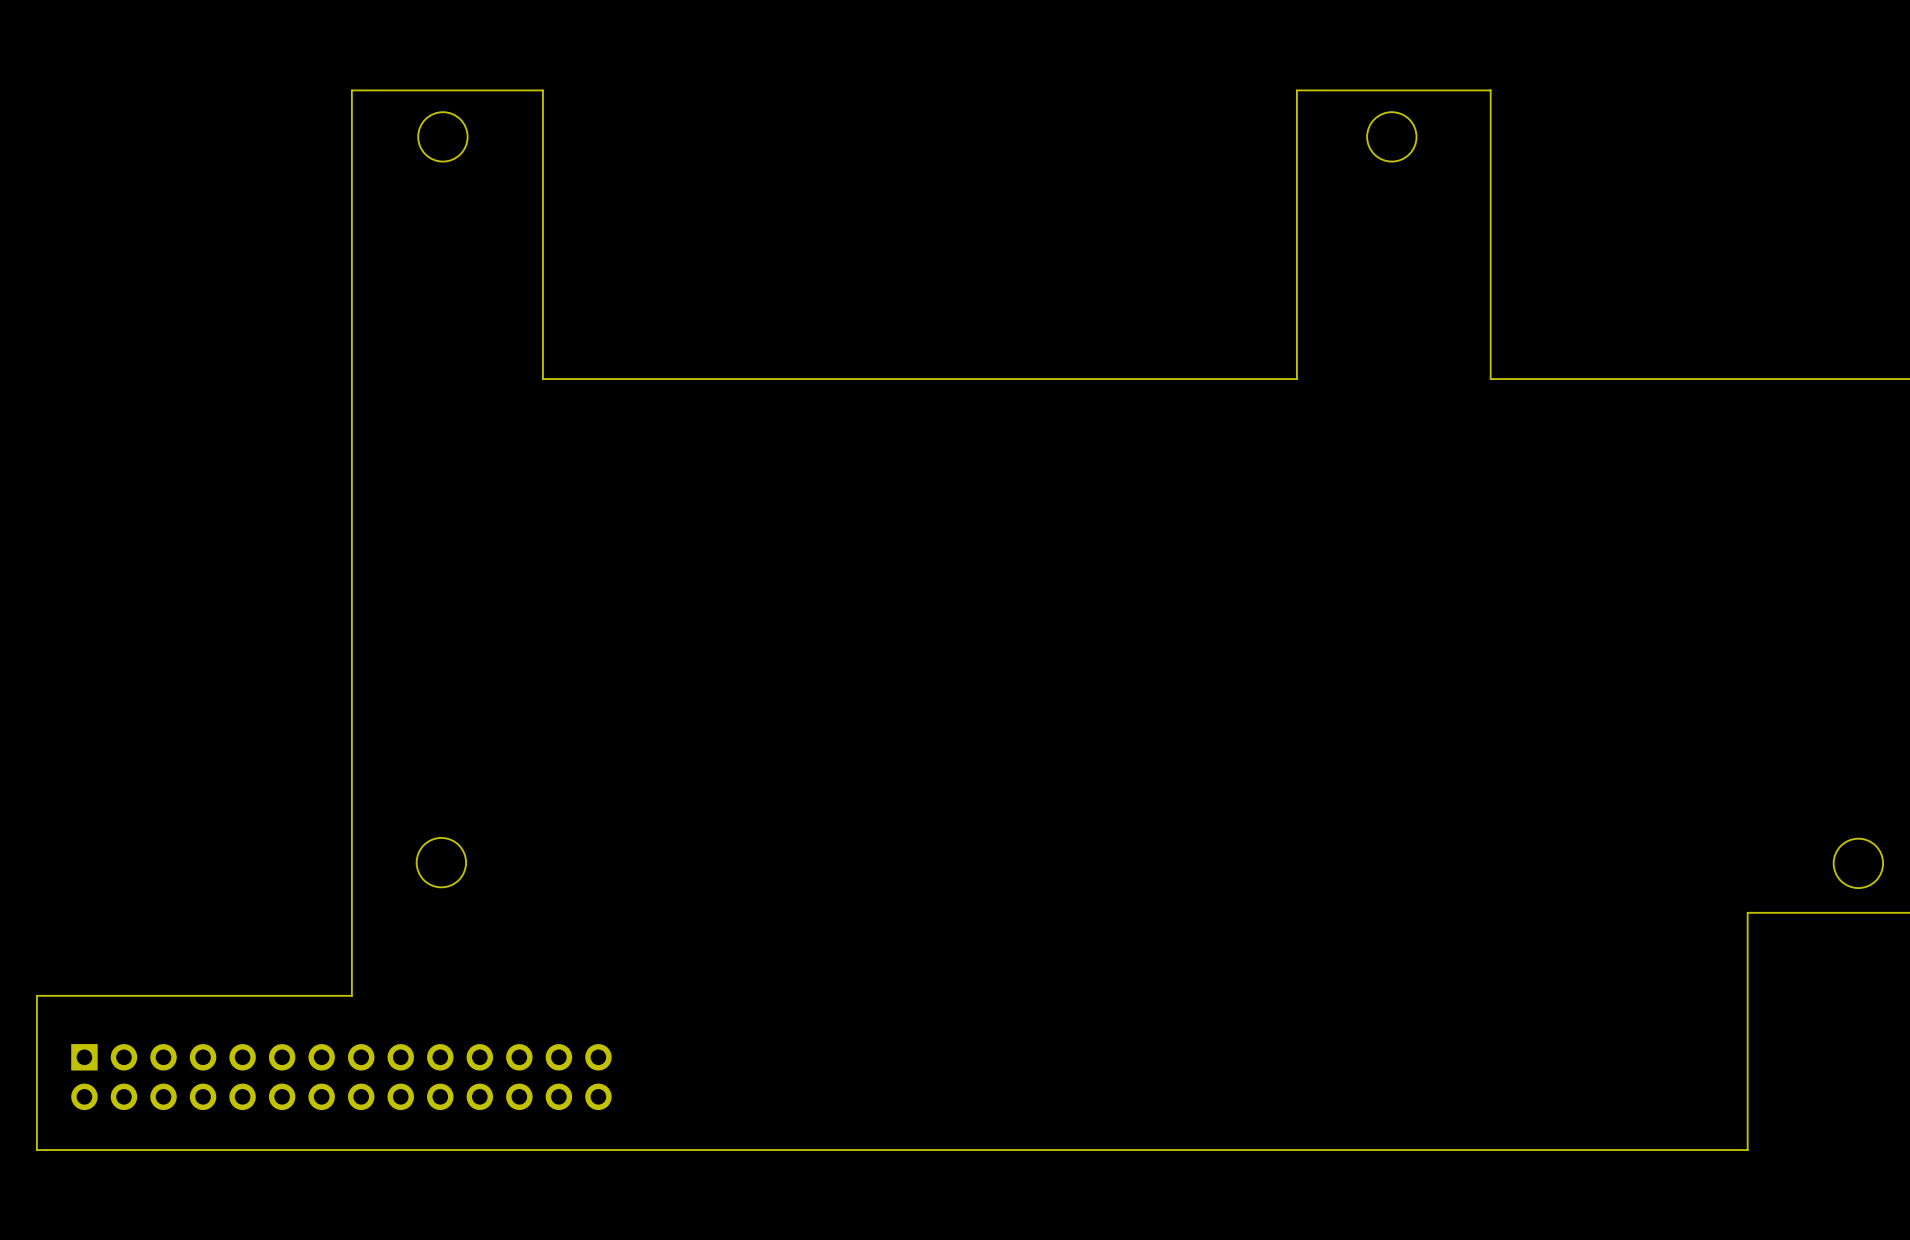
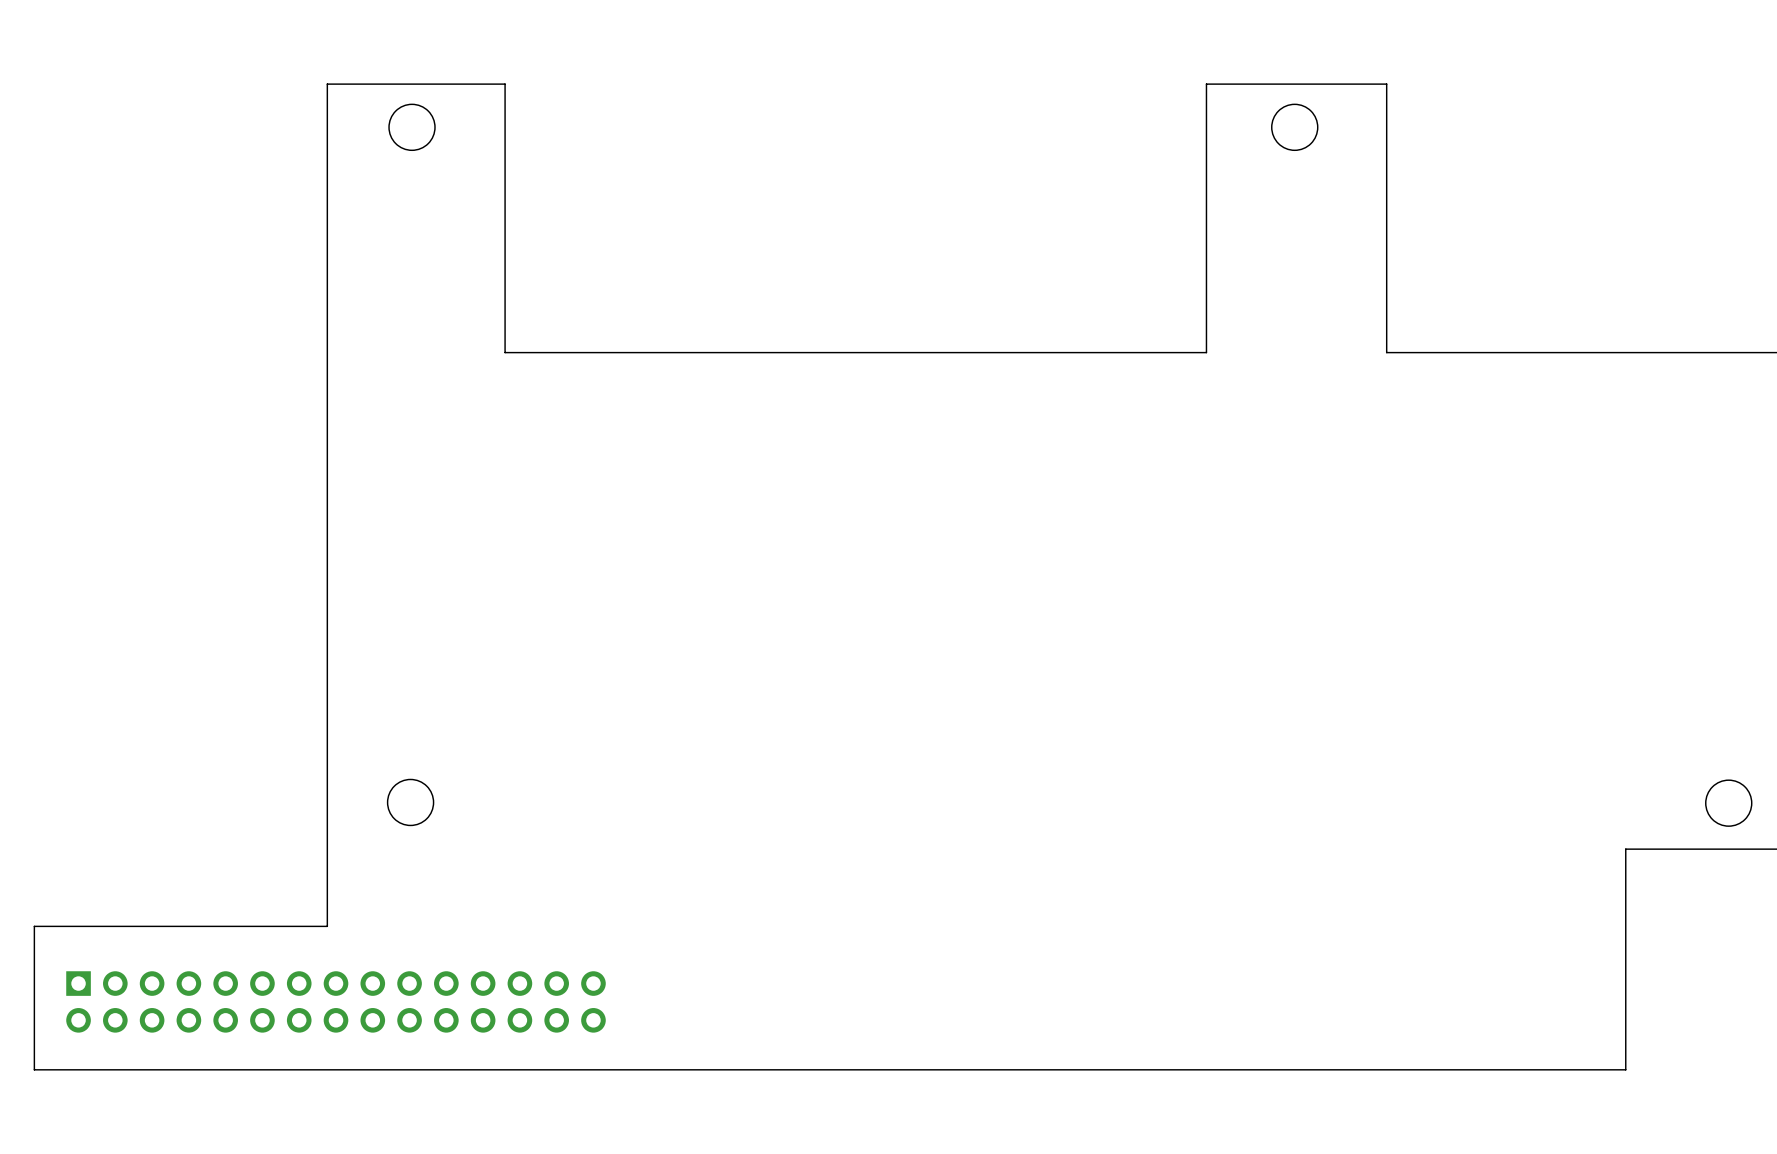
part: none -> (336, 1001)

